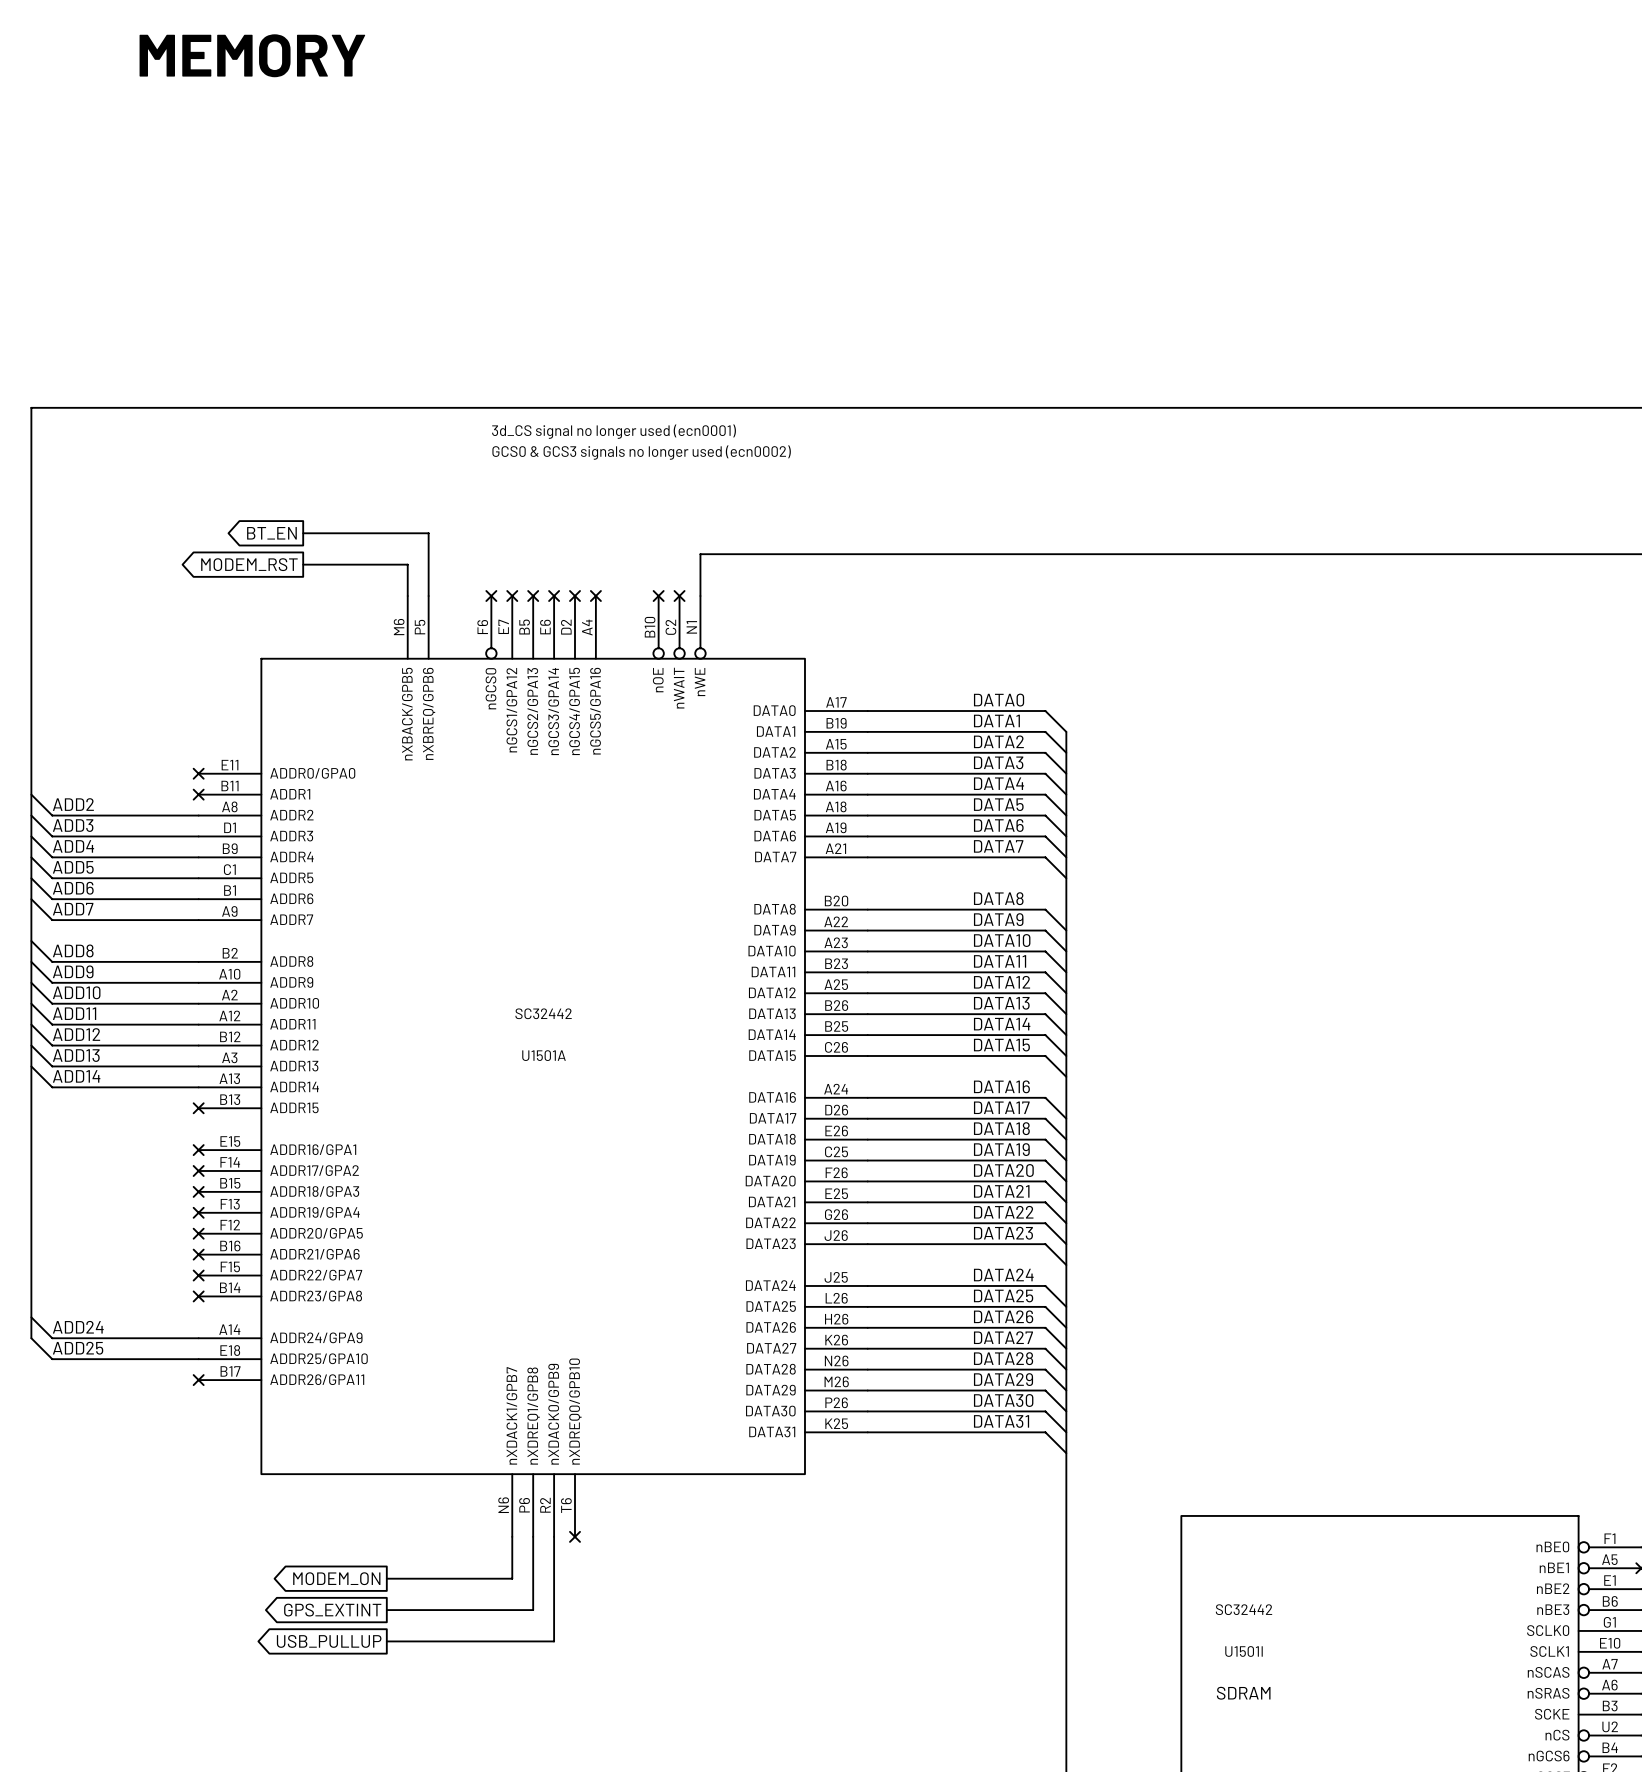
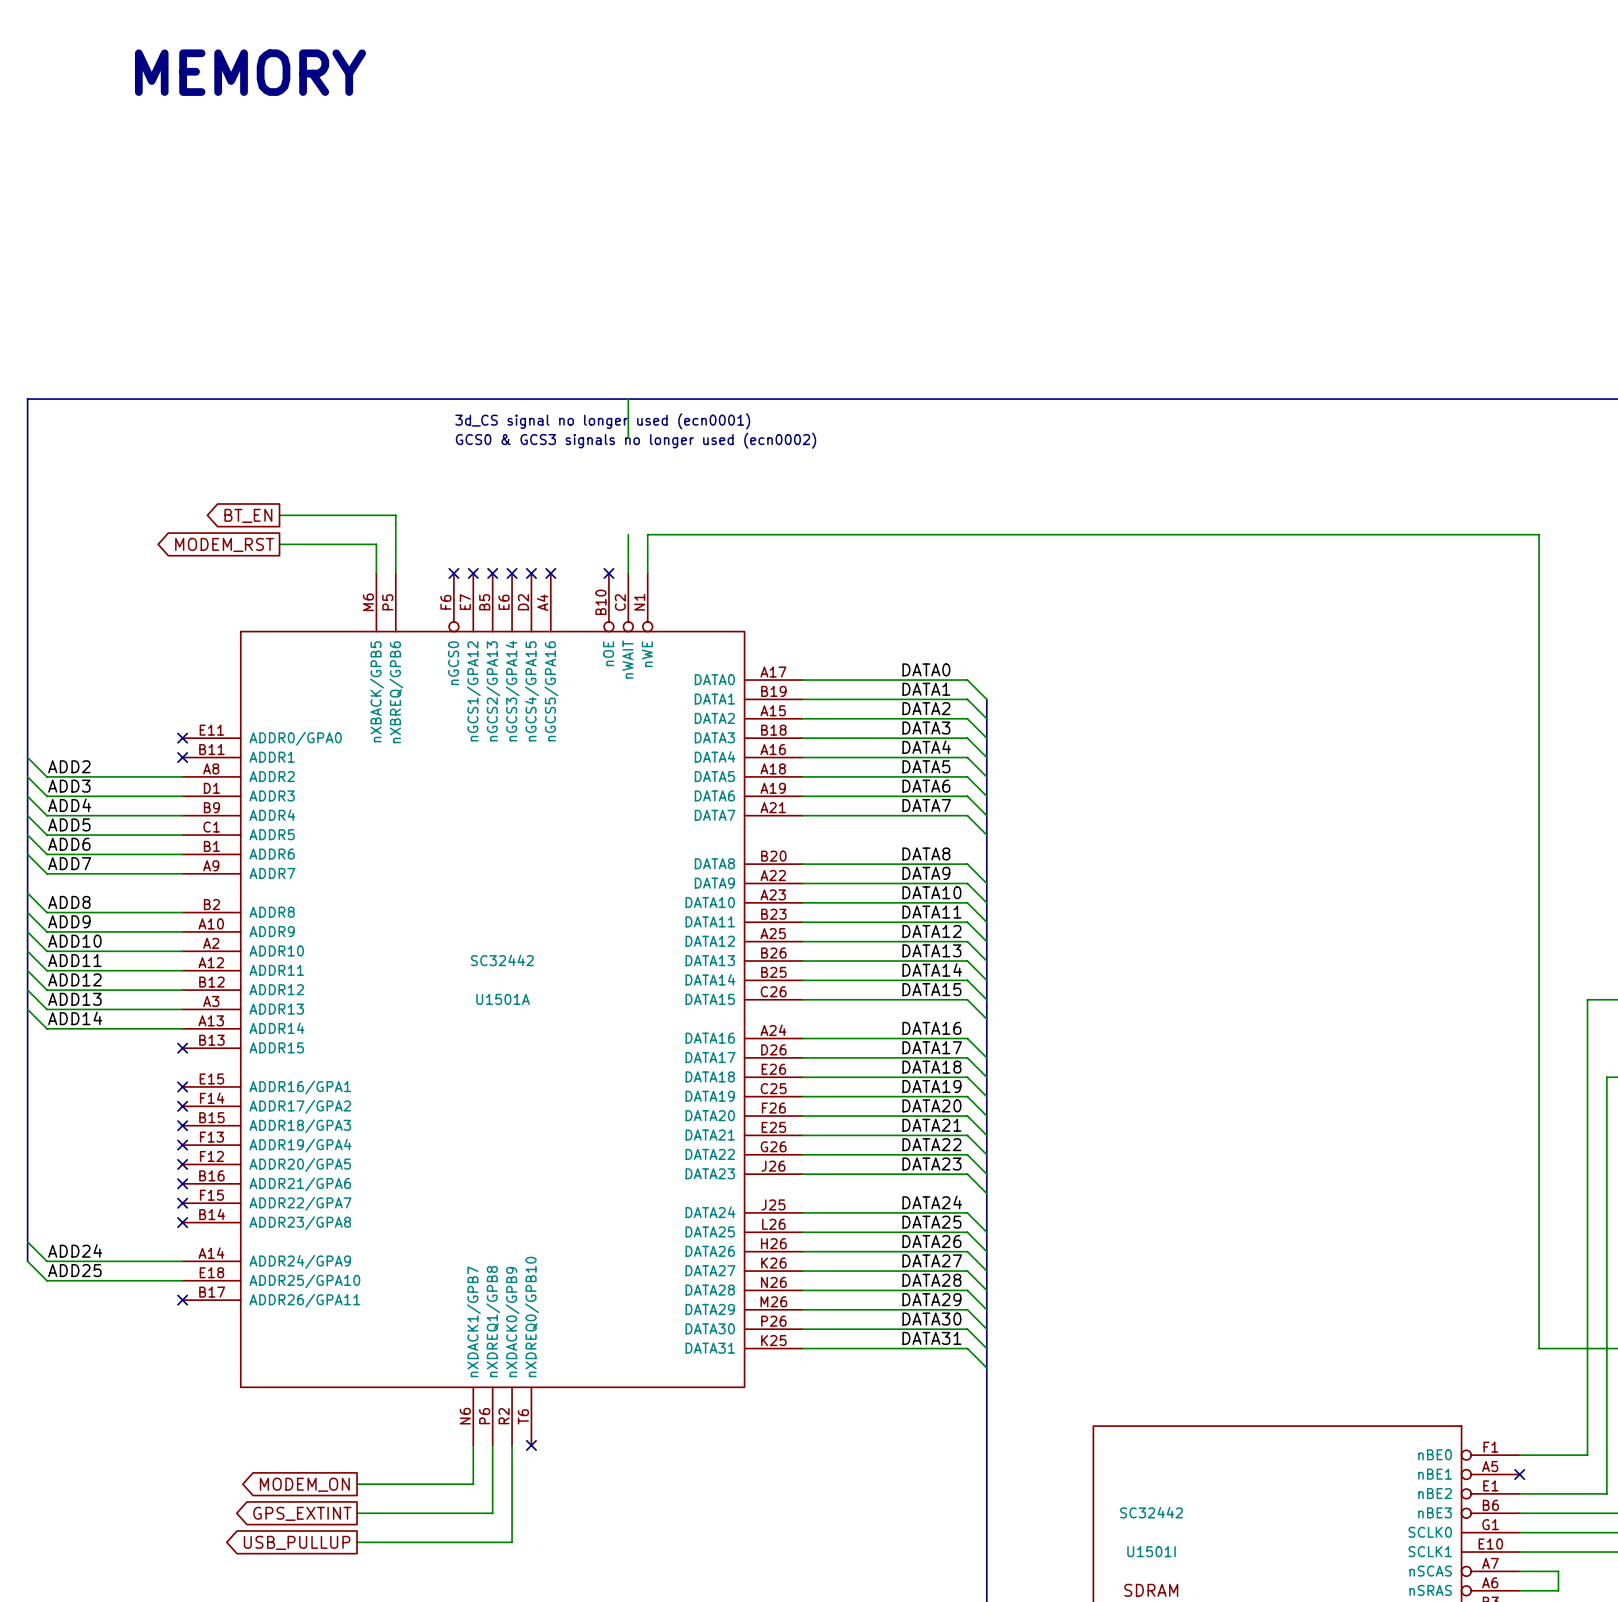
wire: none -> (628, 399) (628, 437)
wire: none -> (628, 534) (628, 573)
no-connect mark: (679, 596) -> none

